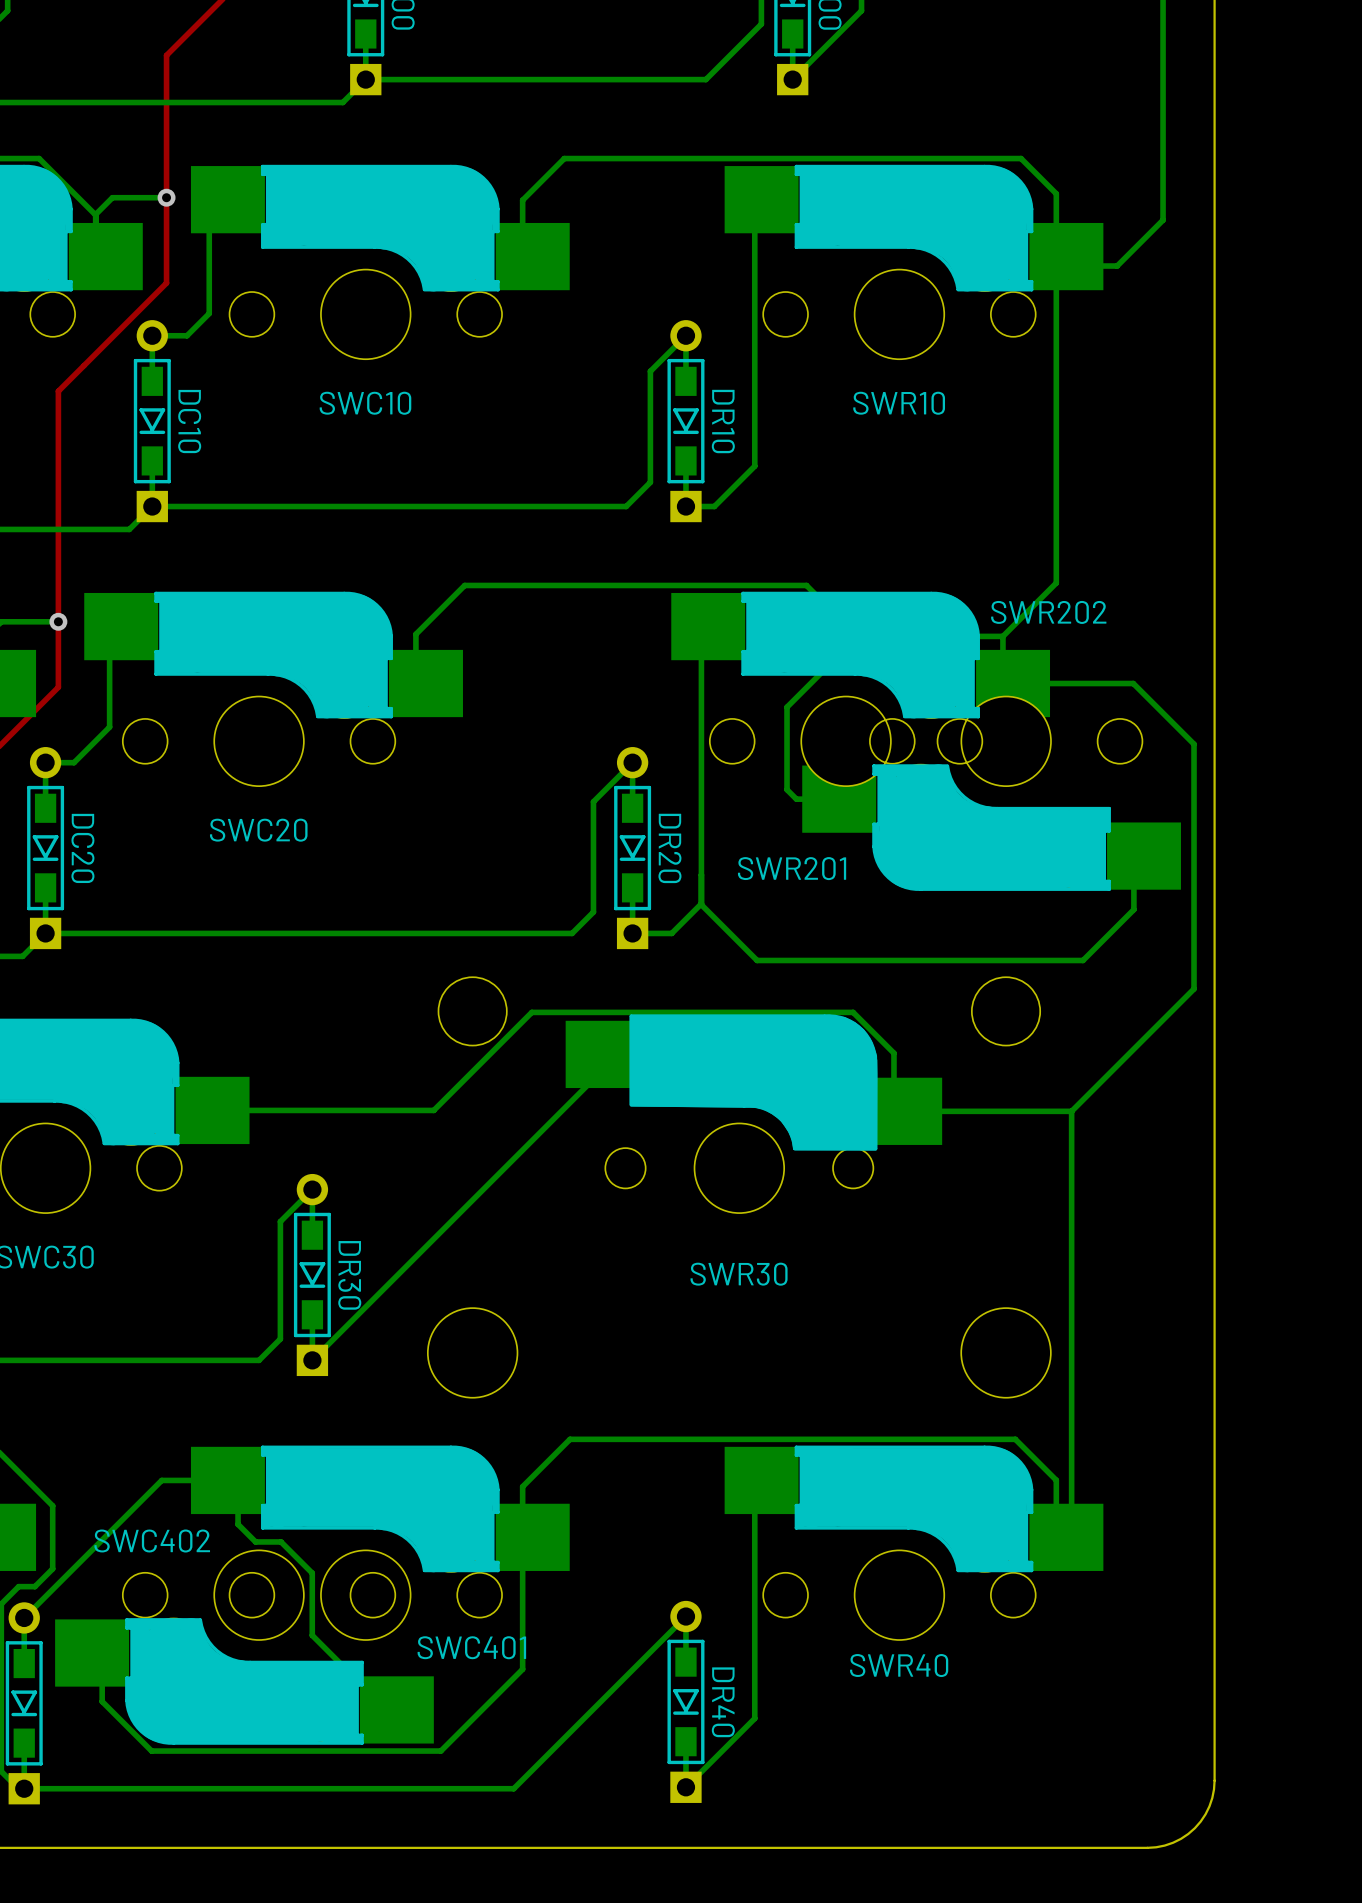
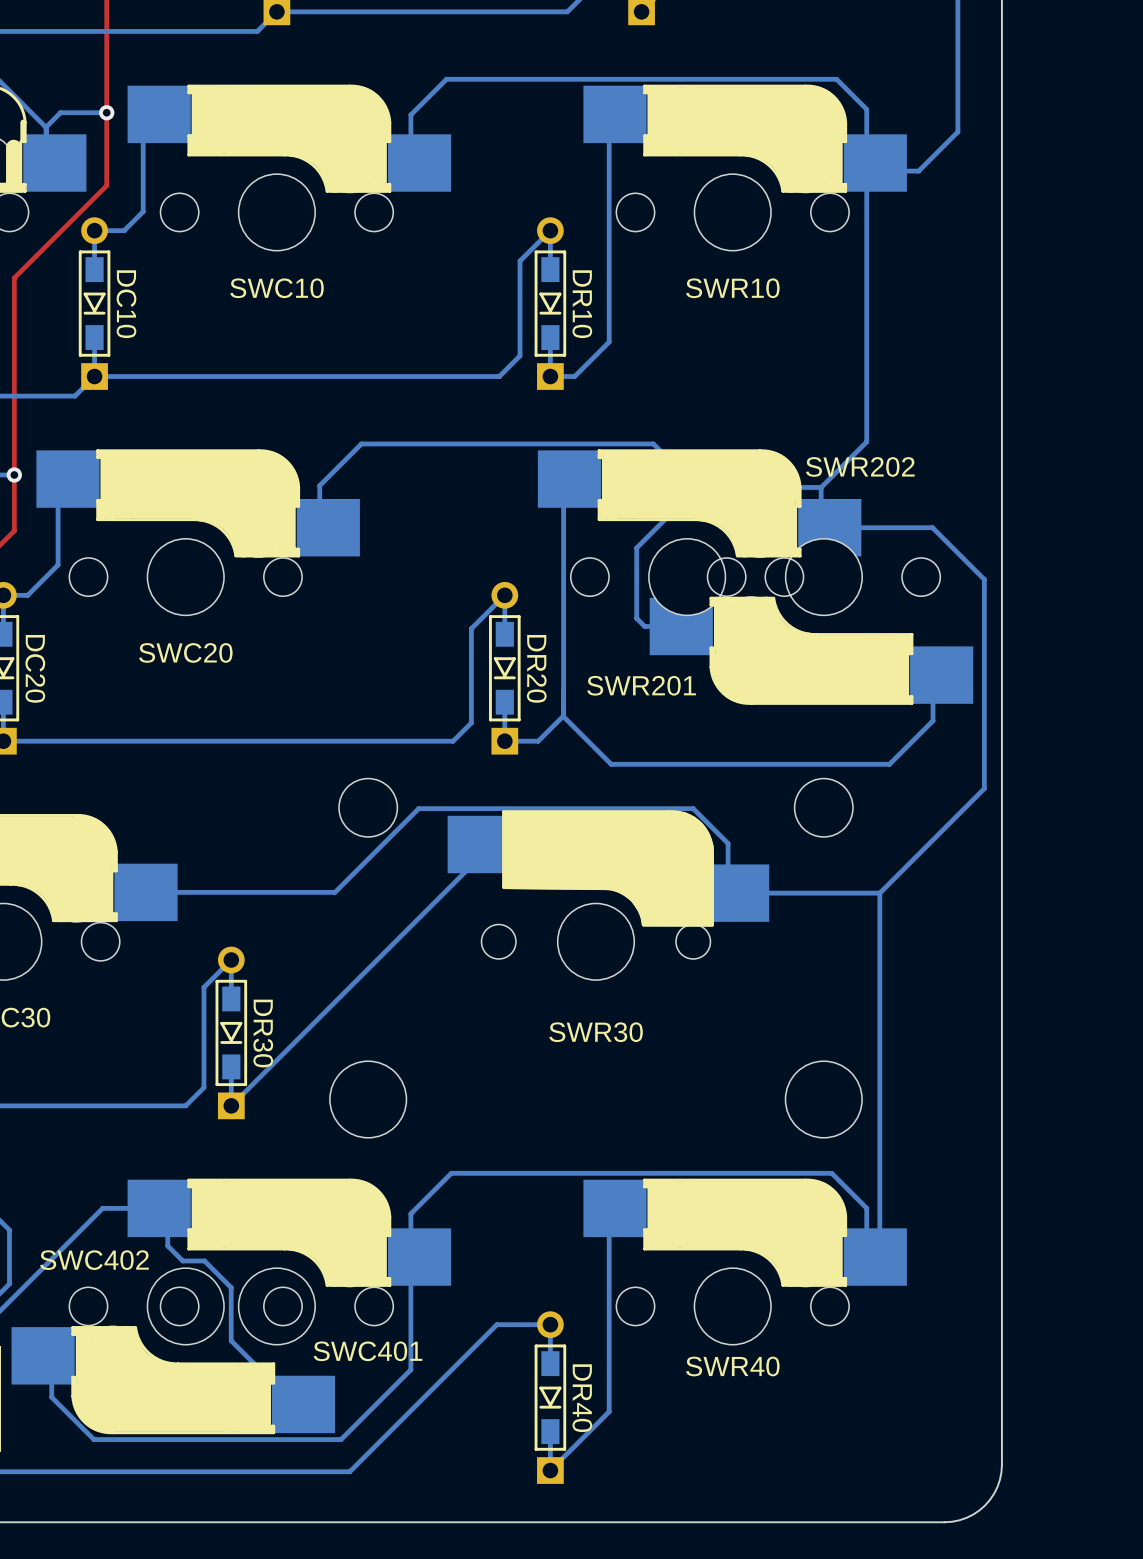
bottom track: (685, 1616) (513, 1788) (451, 1788) -> (550, 1324) (496, 1324) (349, 1471)

